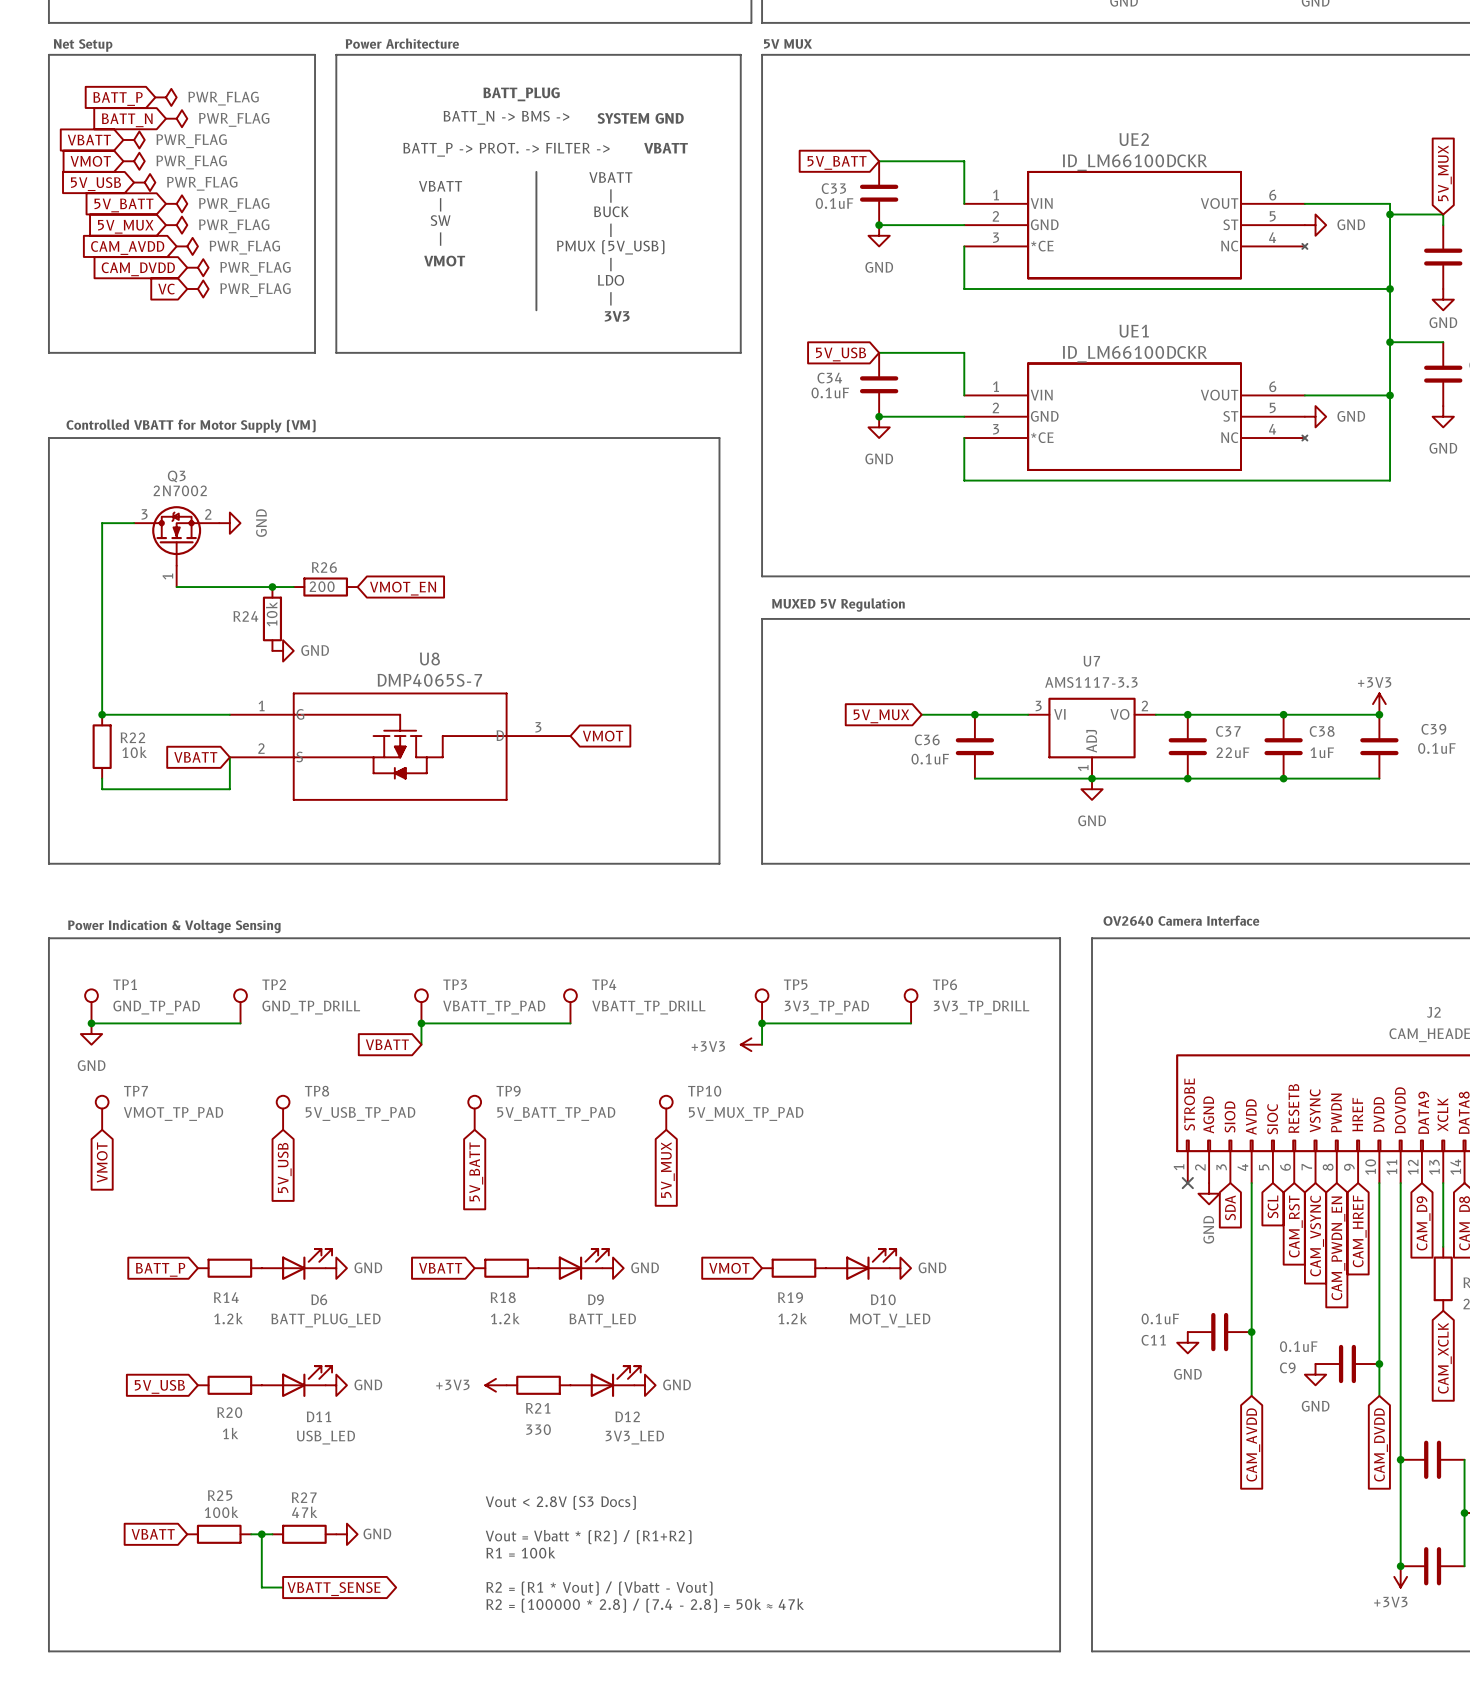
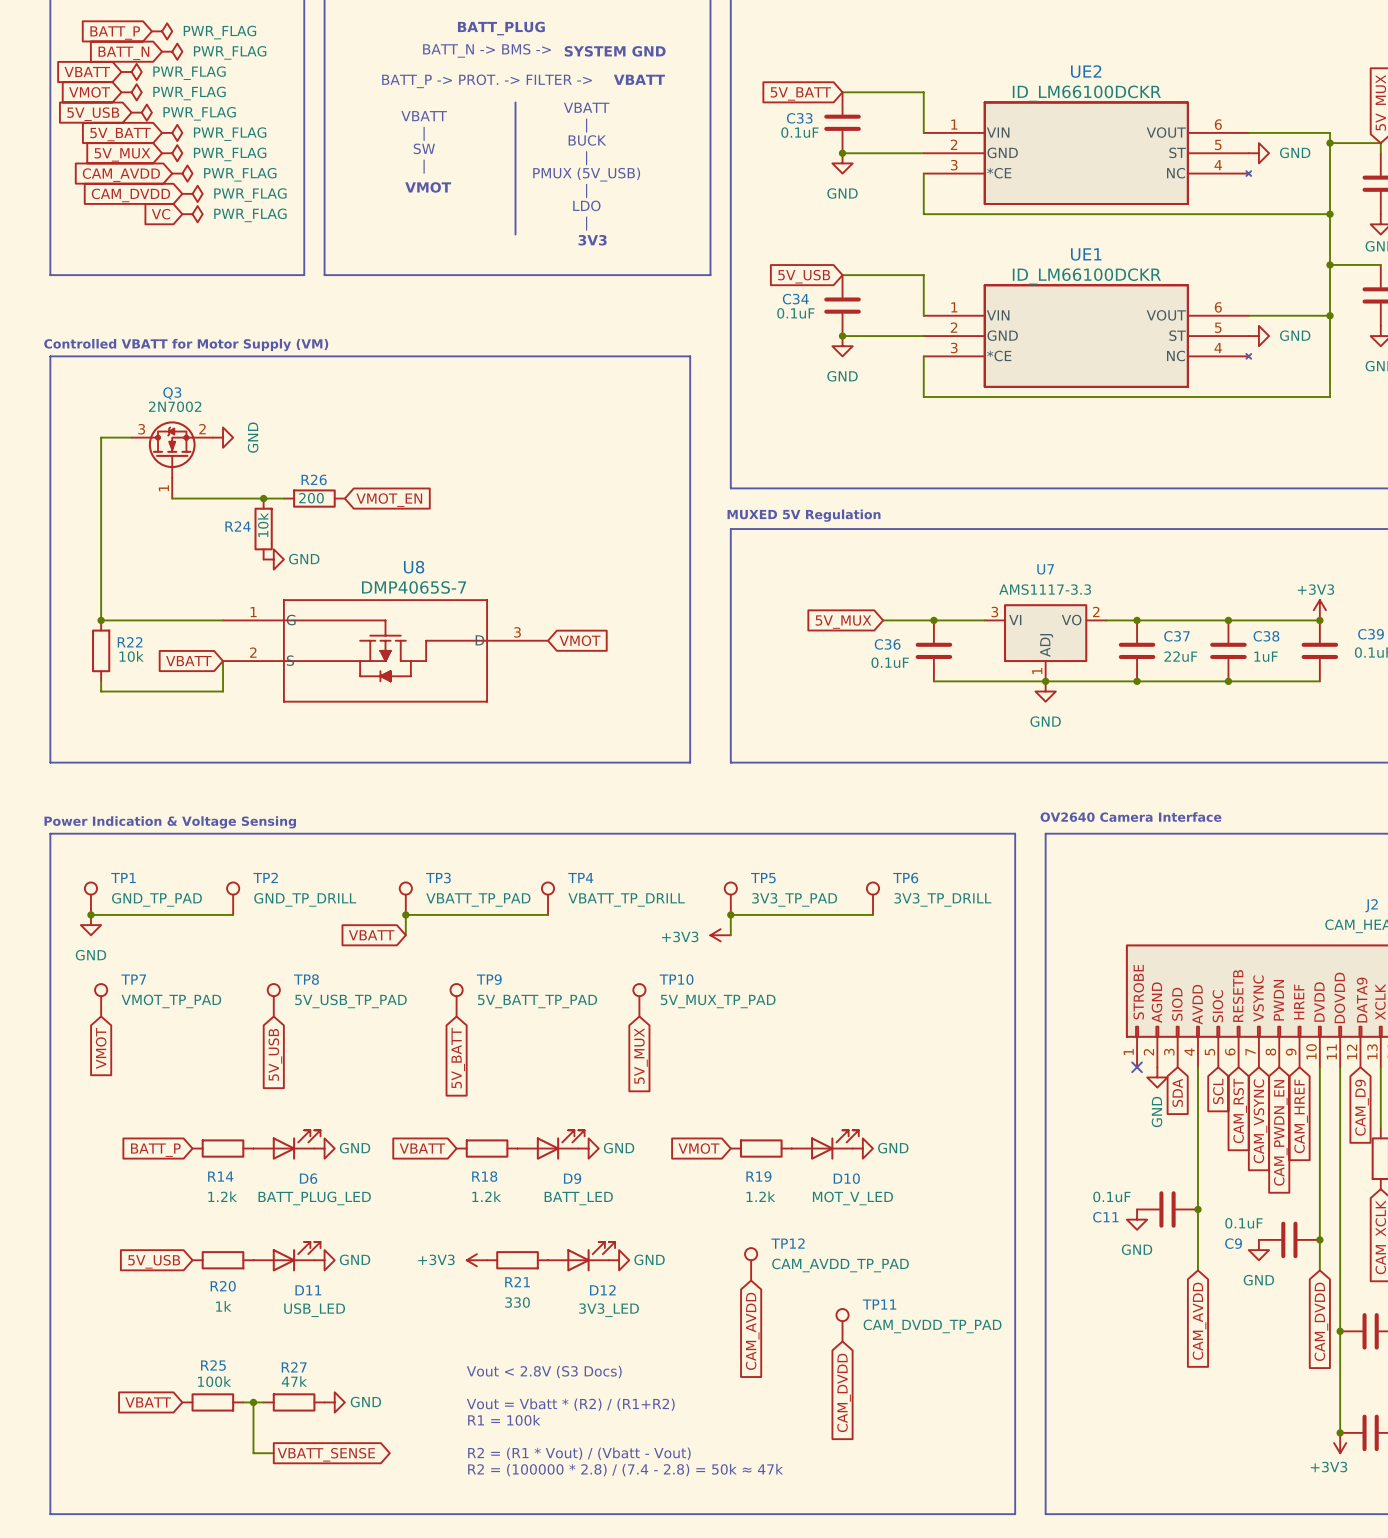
TP12: none -> CAM_AVDD_TP_PAD (751, 1264)
TP11: none -> CAM_DVDD_TP_PAD (842, 1325)
global label: none -> CAM_AVDD (752, 1331)
global label: none -> CAM_DVDD (844, 1392)

